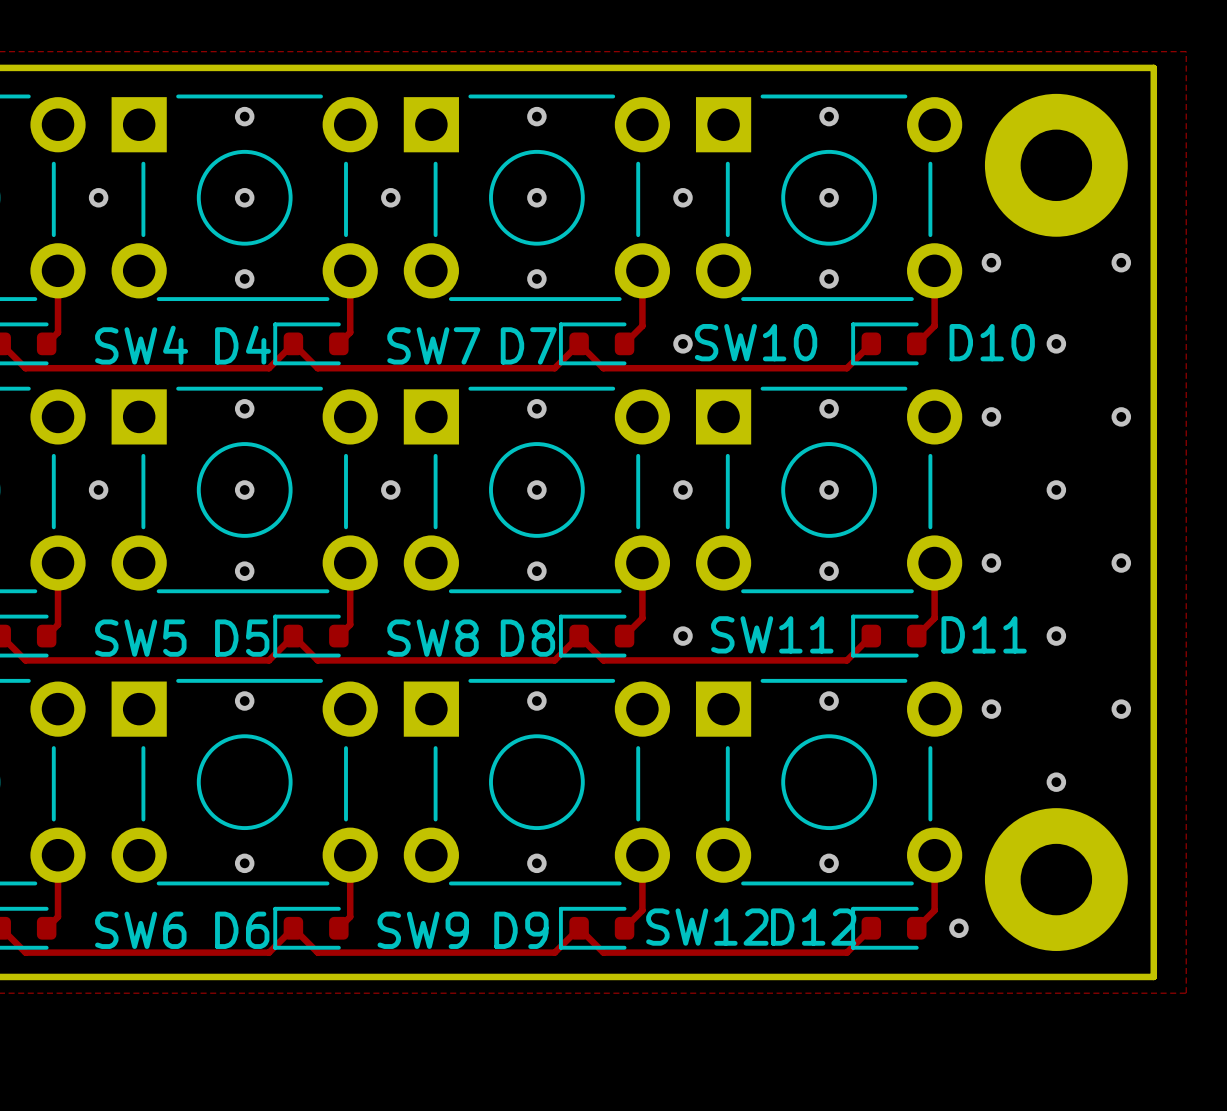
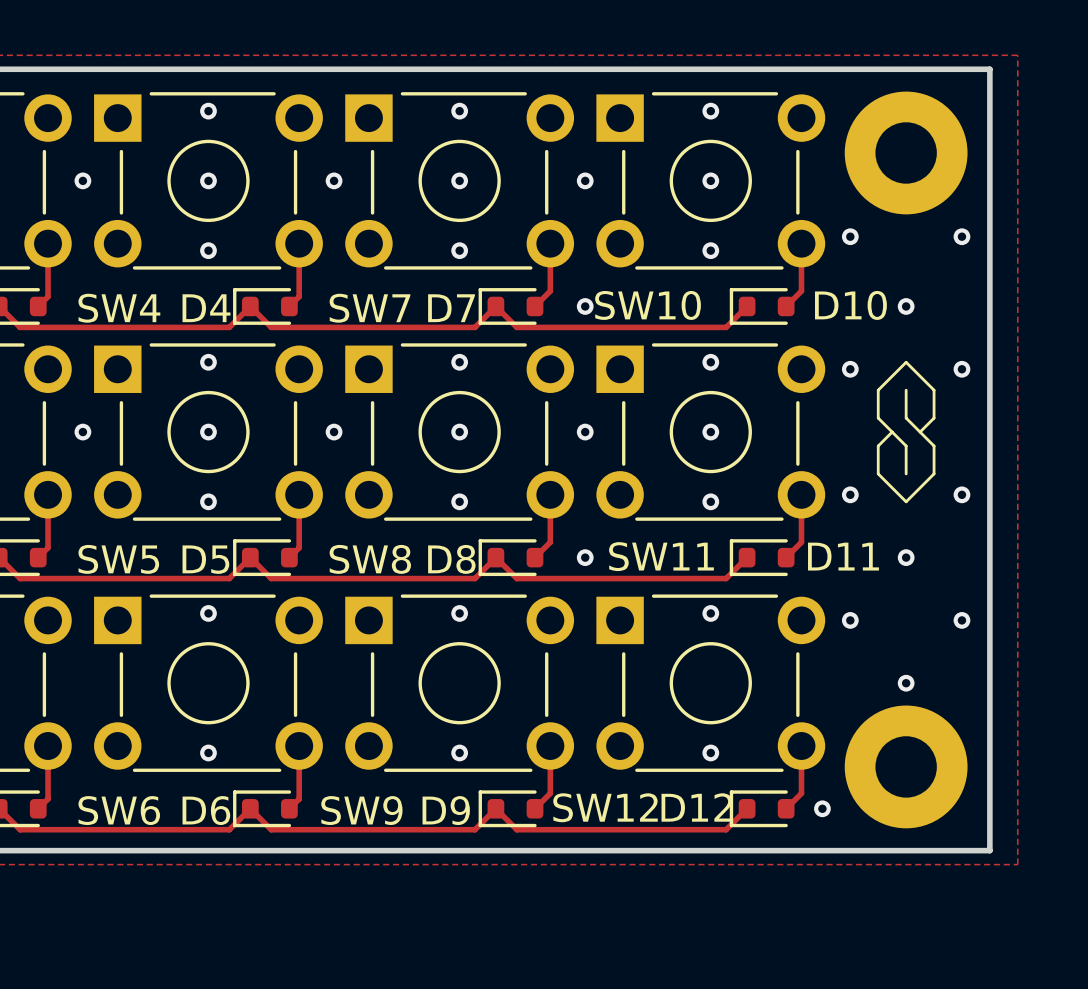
line: none -> (906, 390) (906, 418) (934, 446) (934, 473) (906, 501) (878, 473) (878, 446) (892, 432)
via: (1056, 489) -> none
line: none -> (920, 432) (934, 418) (934, 390) (906, 362) (878, 390) (878, 418) (906, 446) (906, 473)

